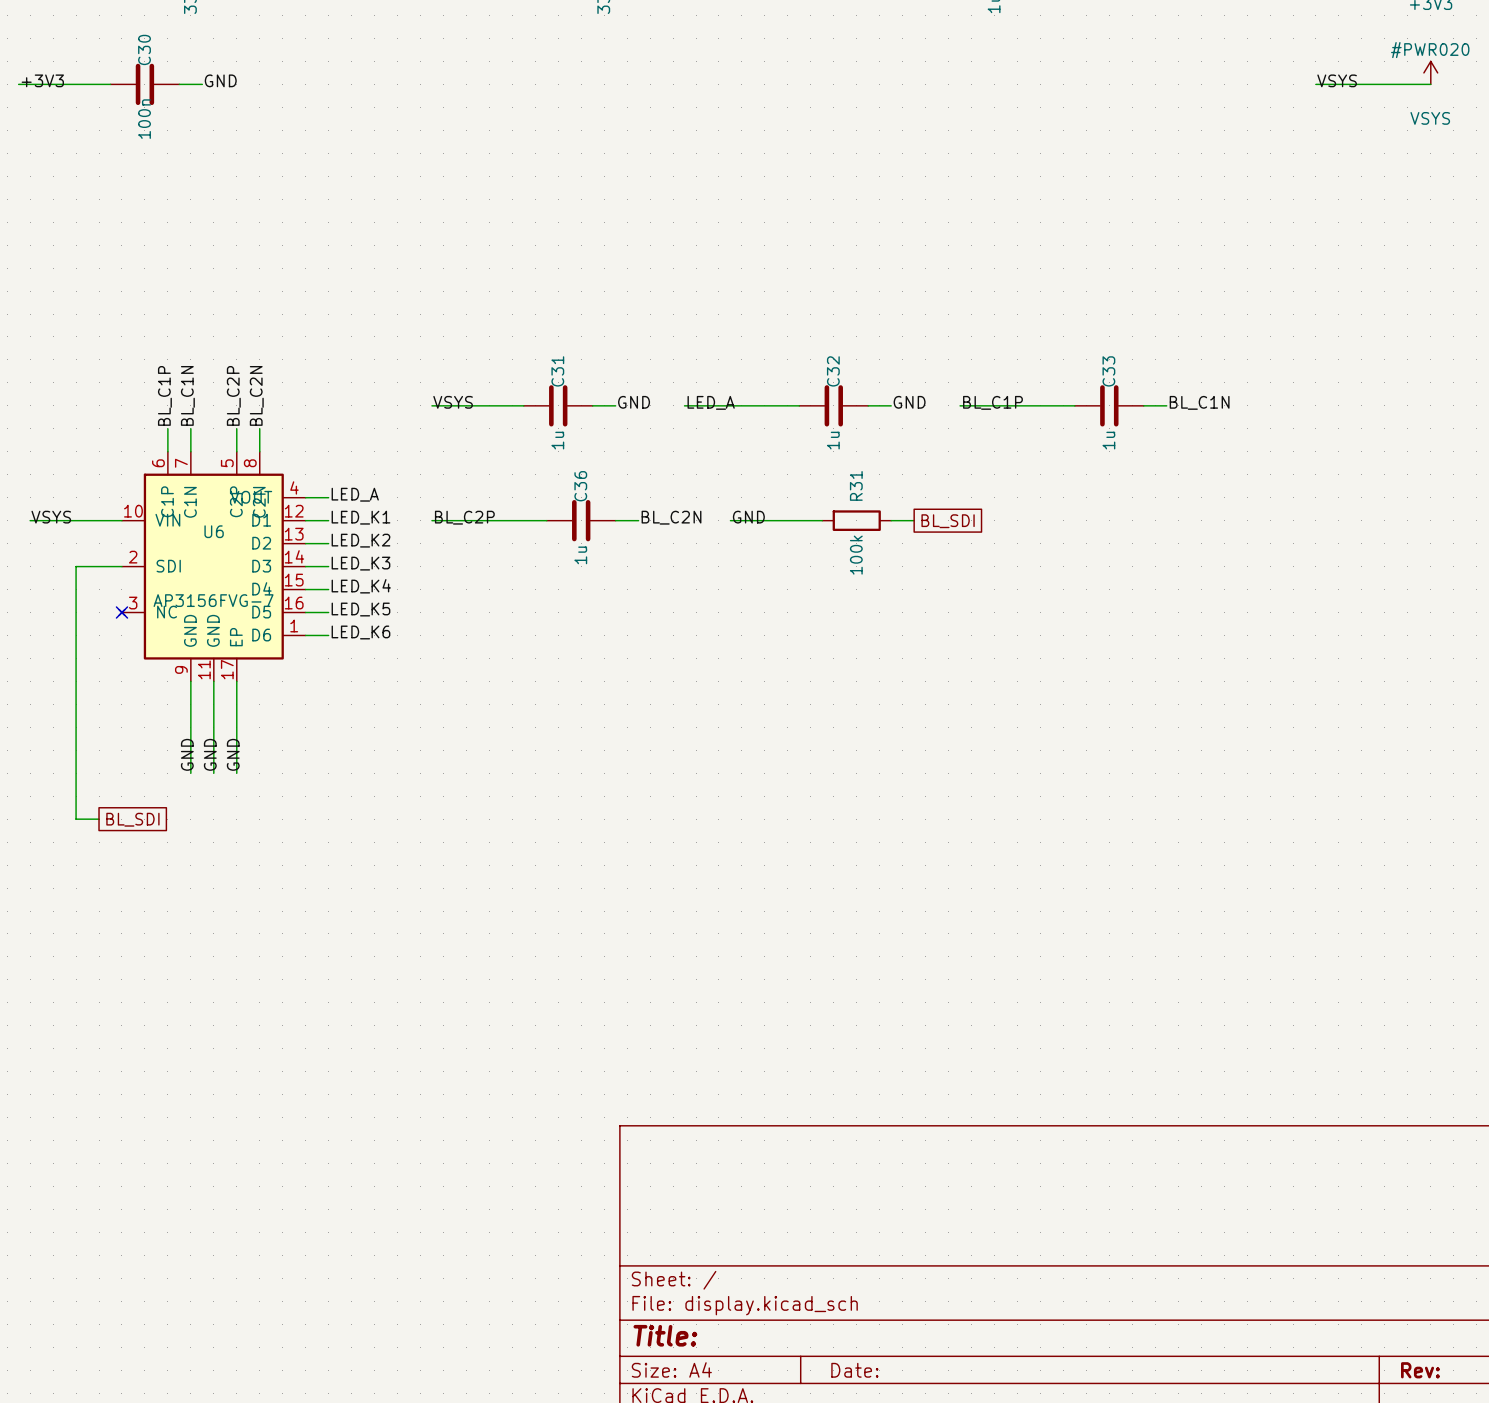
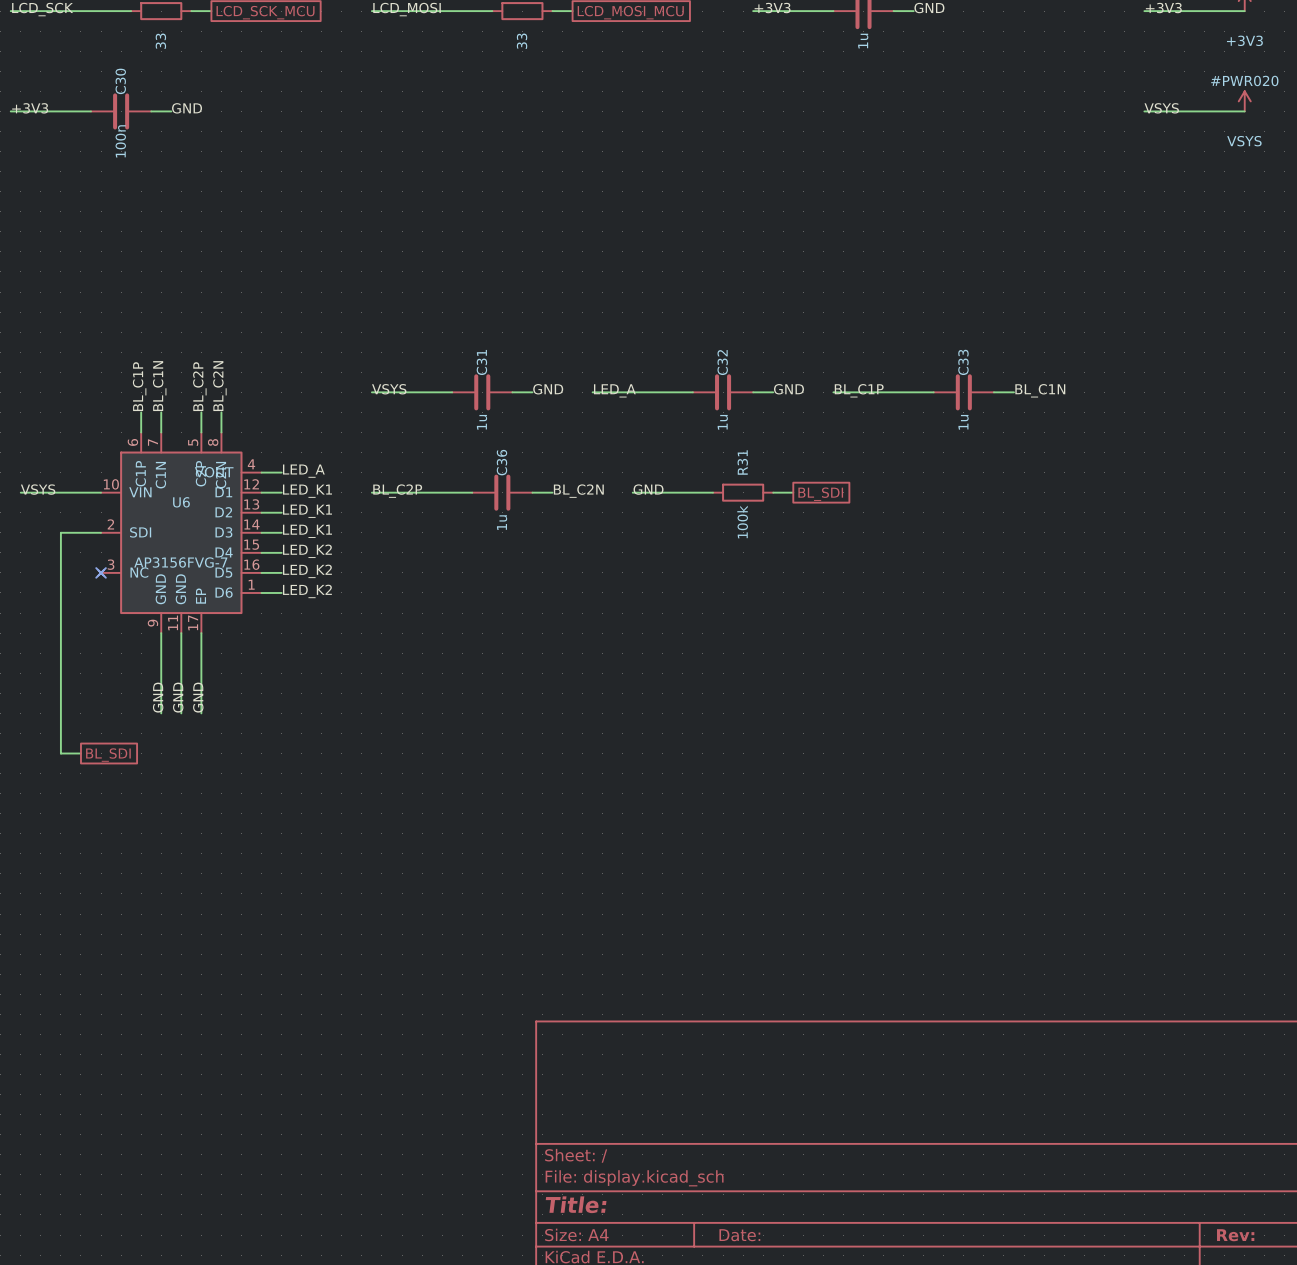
label: LED_K2 (360, 540) -> LED_K1 (307, 511)
label: LED_K3 (360, 563) -> LED_K1 (307, 531)
label: LED_K4 (361, 586) -> LED_K2 (307, 551)
label: LED_K5 (360, 609) -> LED_K2 (307, 571)
label: LED_K6 (360, 632) -> LED_K2 (307, 591)

